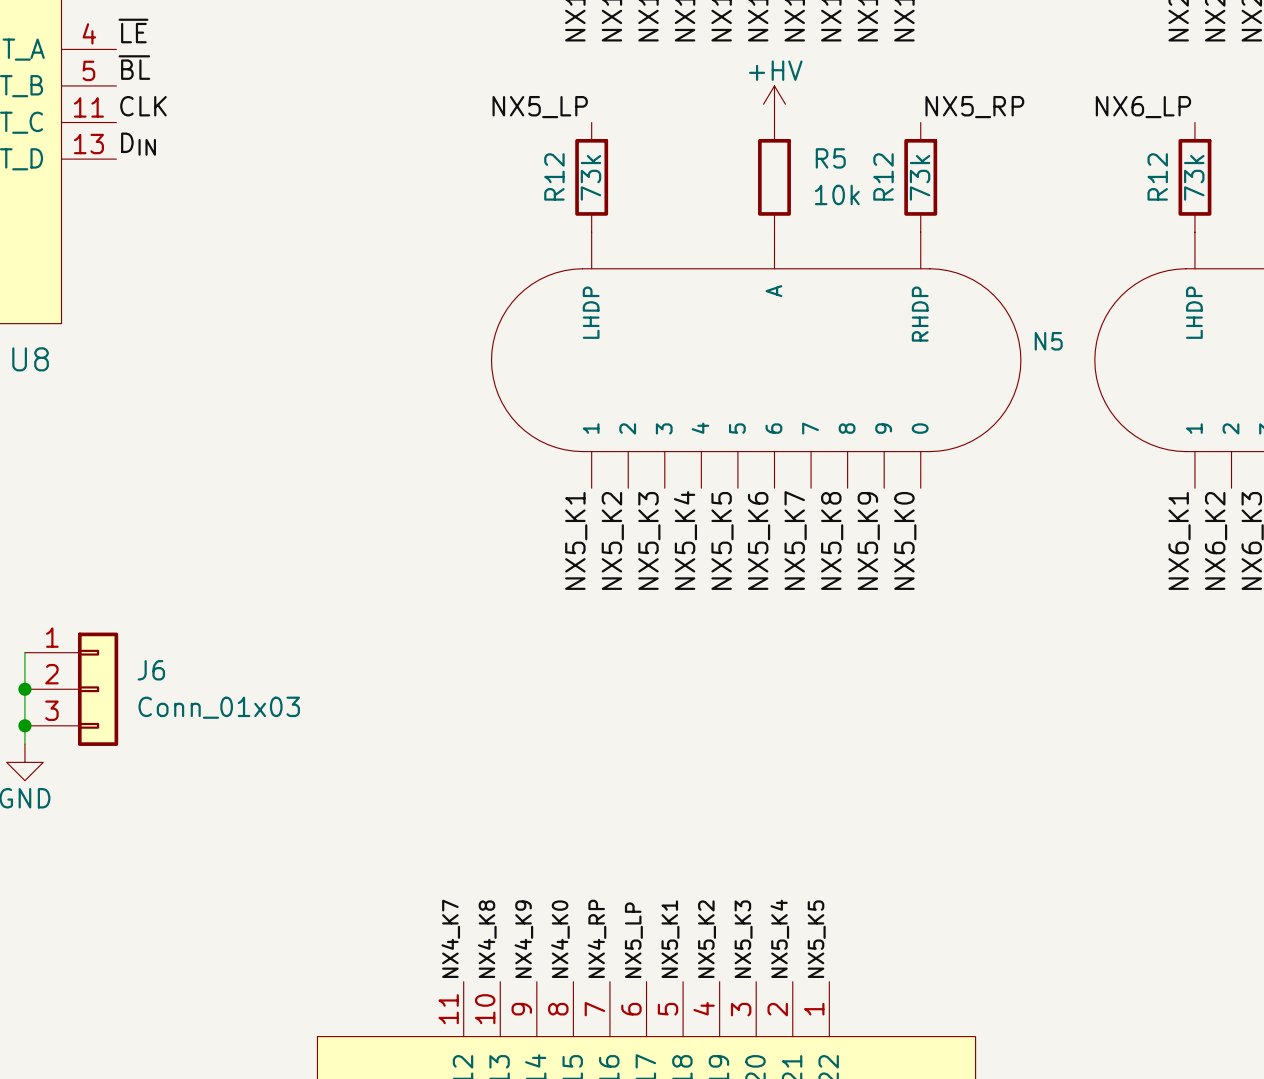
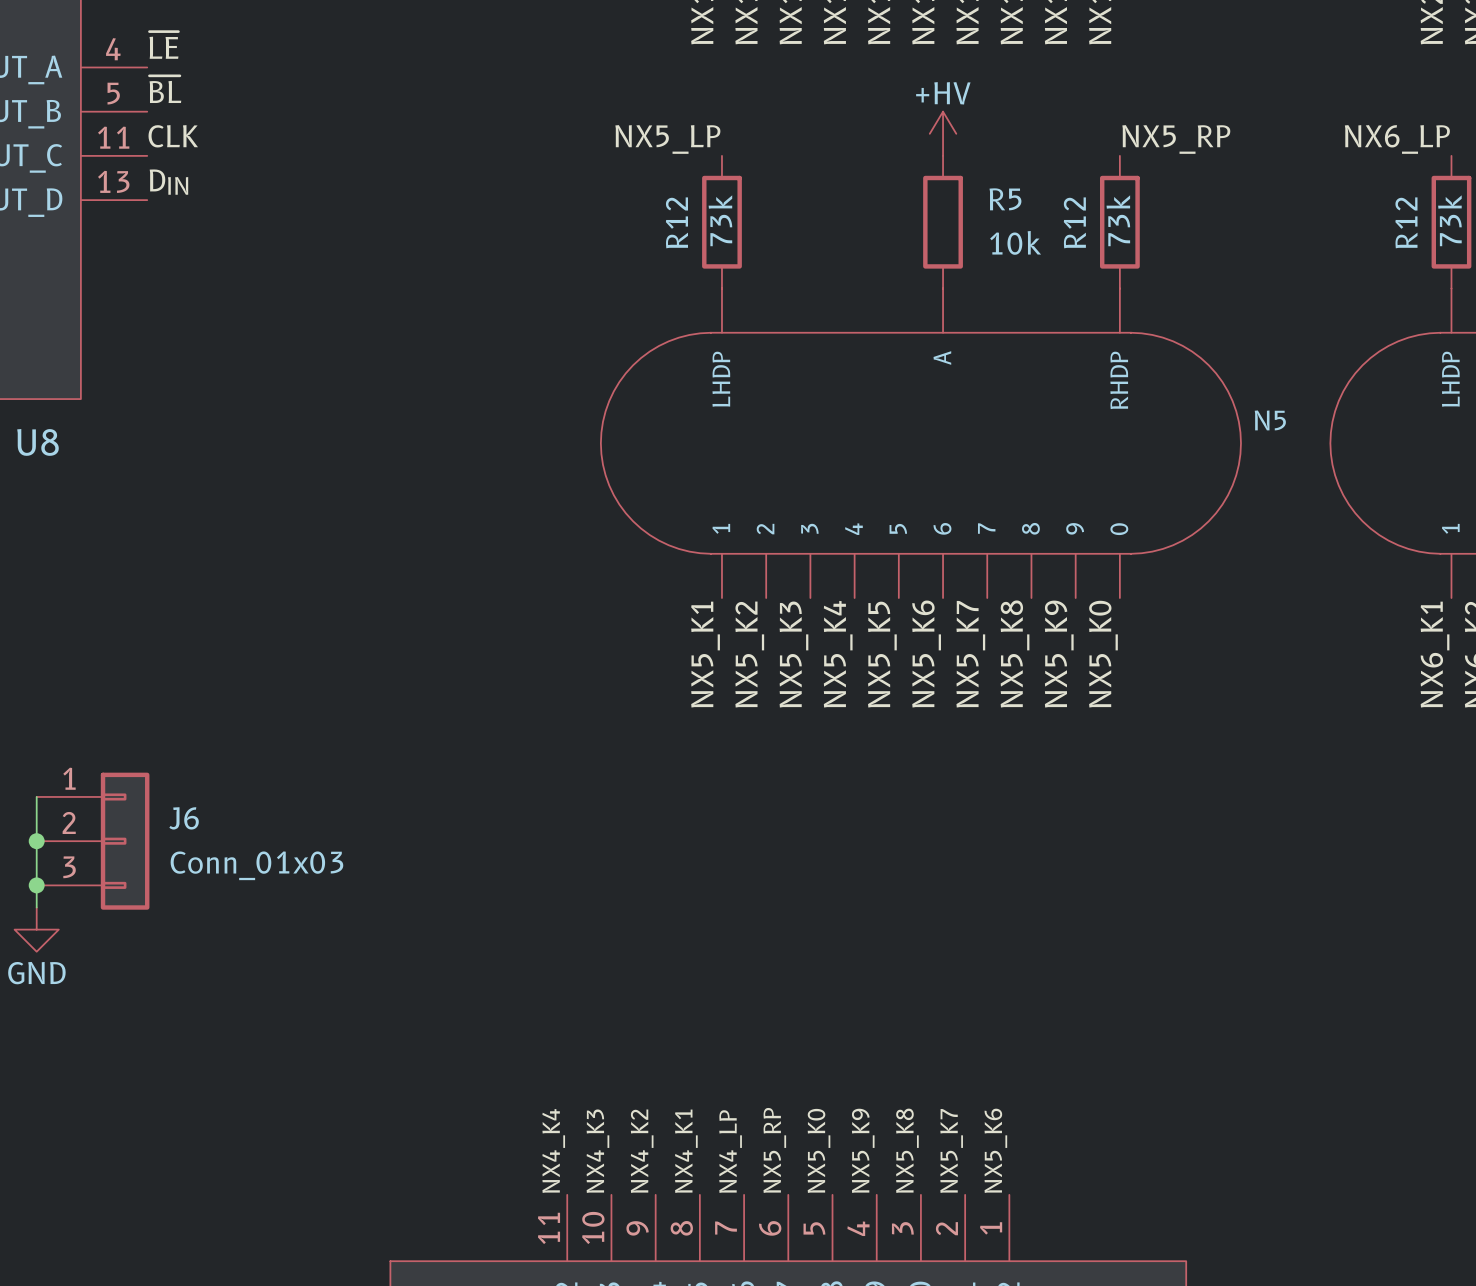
label: NX4_K7 (450, 938) -> NX4_K4 (553, 1150)
label: NX4_RP (596, 938) -> NX4_LP (730, 1151)
label: NX5_K4 (779, 938) -> NX5_K7 (951, 1150)
label: NX4_K8 (487, 939) -> NX4_K3 (597, 1151)
label: NX4_K9 (523, 939) -> NX4_K2 (642, 1151)
label: NX4_K0 (560, 939) -> NX4_K1 (686, 1151)
label: NX5_K1 (670, 939) -> NX5_K0 (819, 1150)
label: NX5_K2 (707, 939) -> NX5_K9 (863, 1150)
label: NX5_K3 (743, 939) -> NX5_K8 (907, 1150)
label: NX5_K5 (816, 939) -> NX5_K6 (995, 1150)
label: NX5_LP (633, 940) -> NX5_RP (774, 1150)

